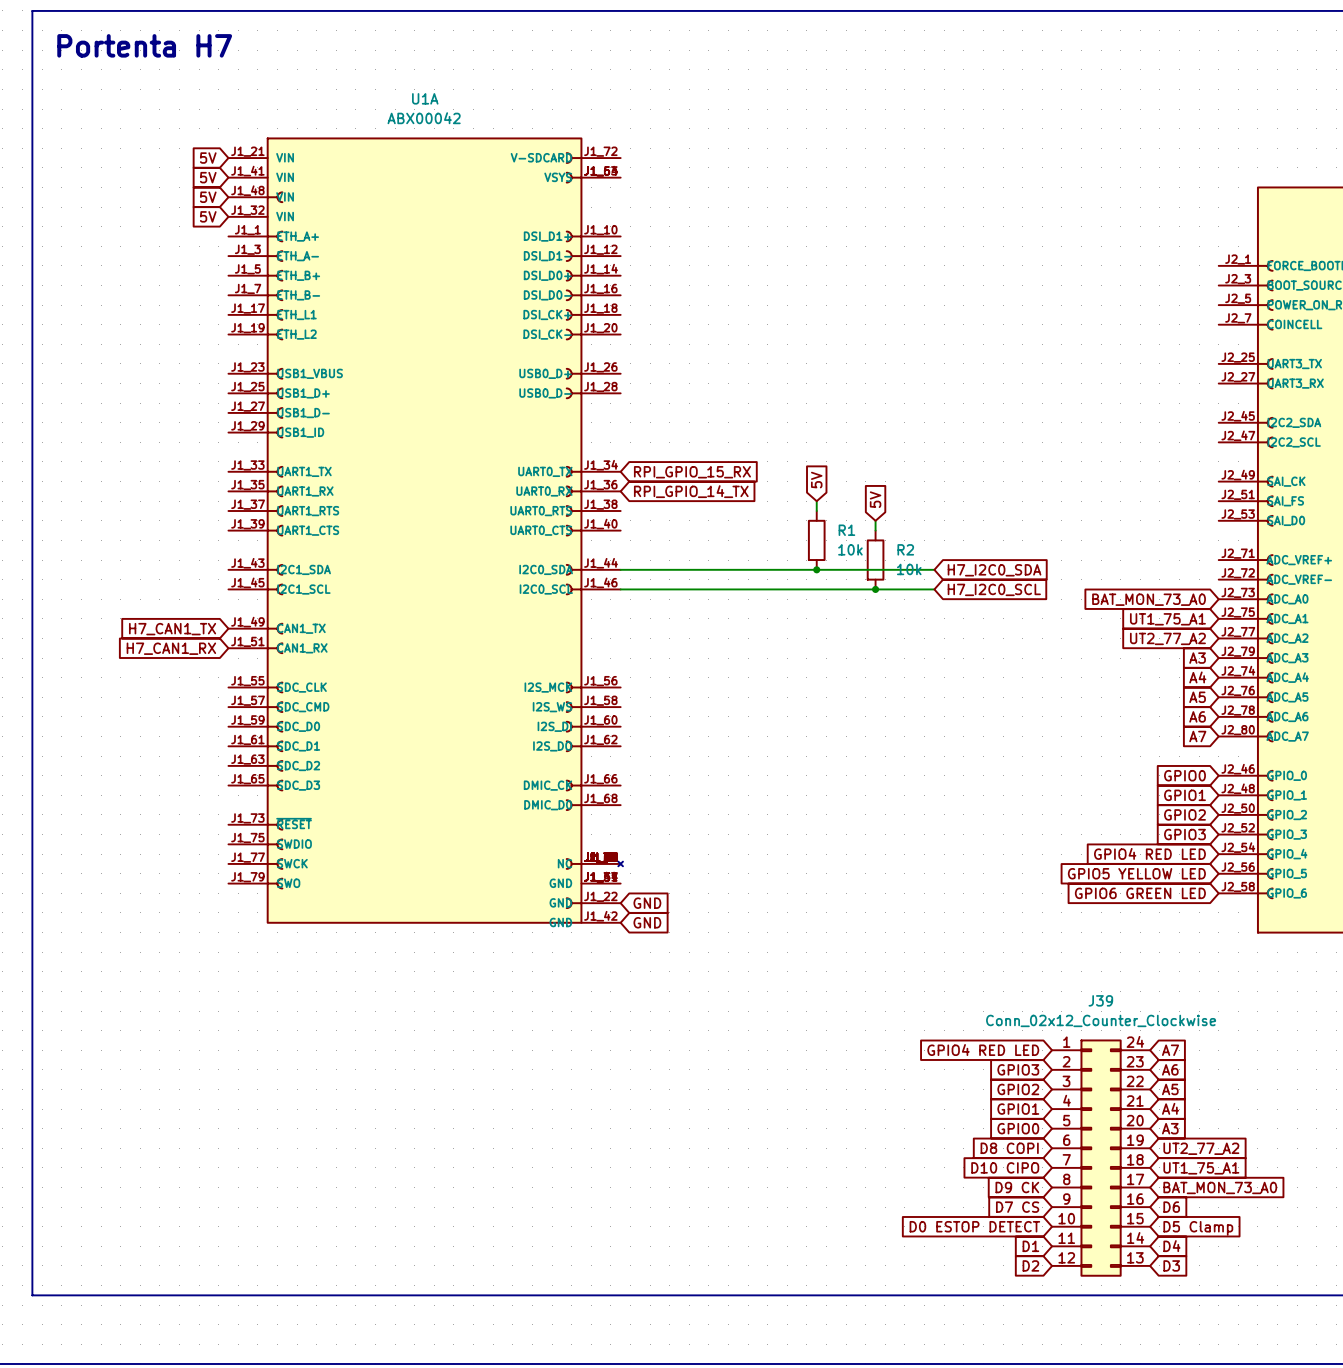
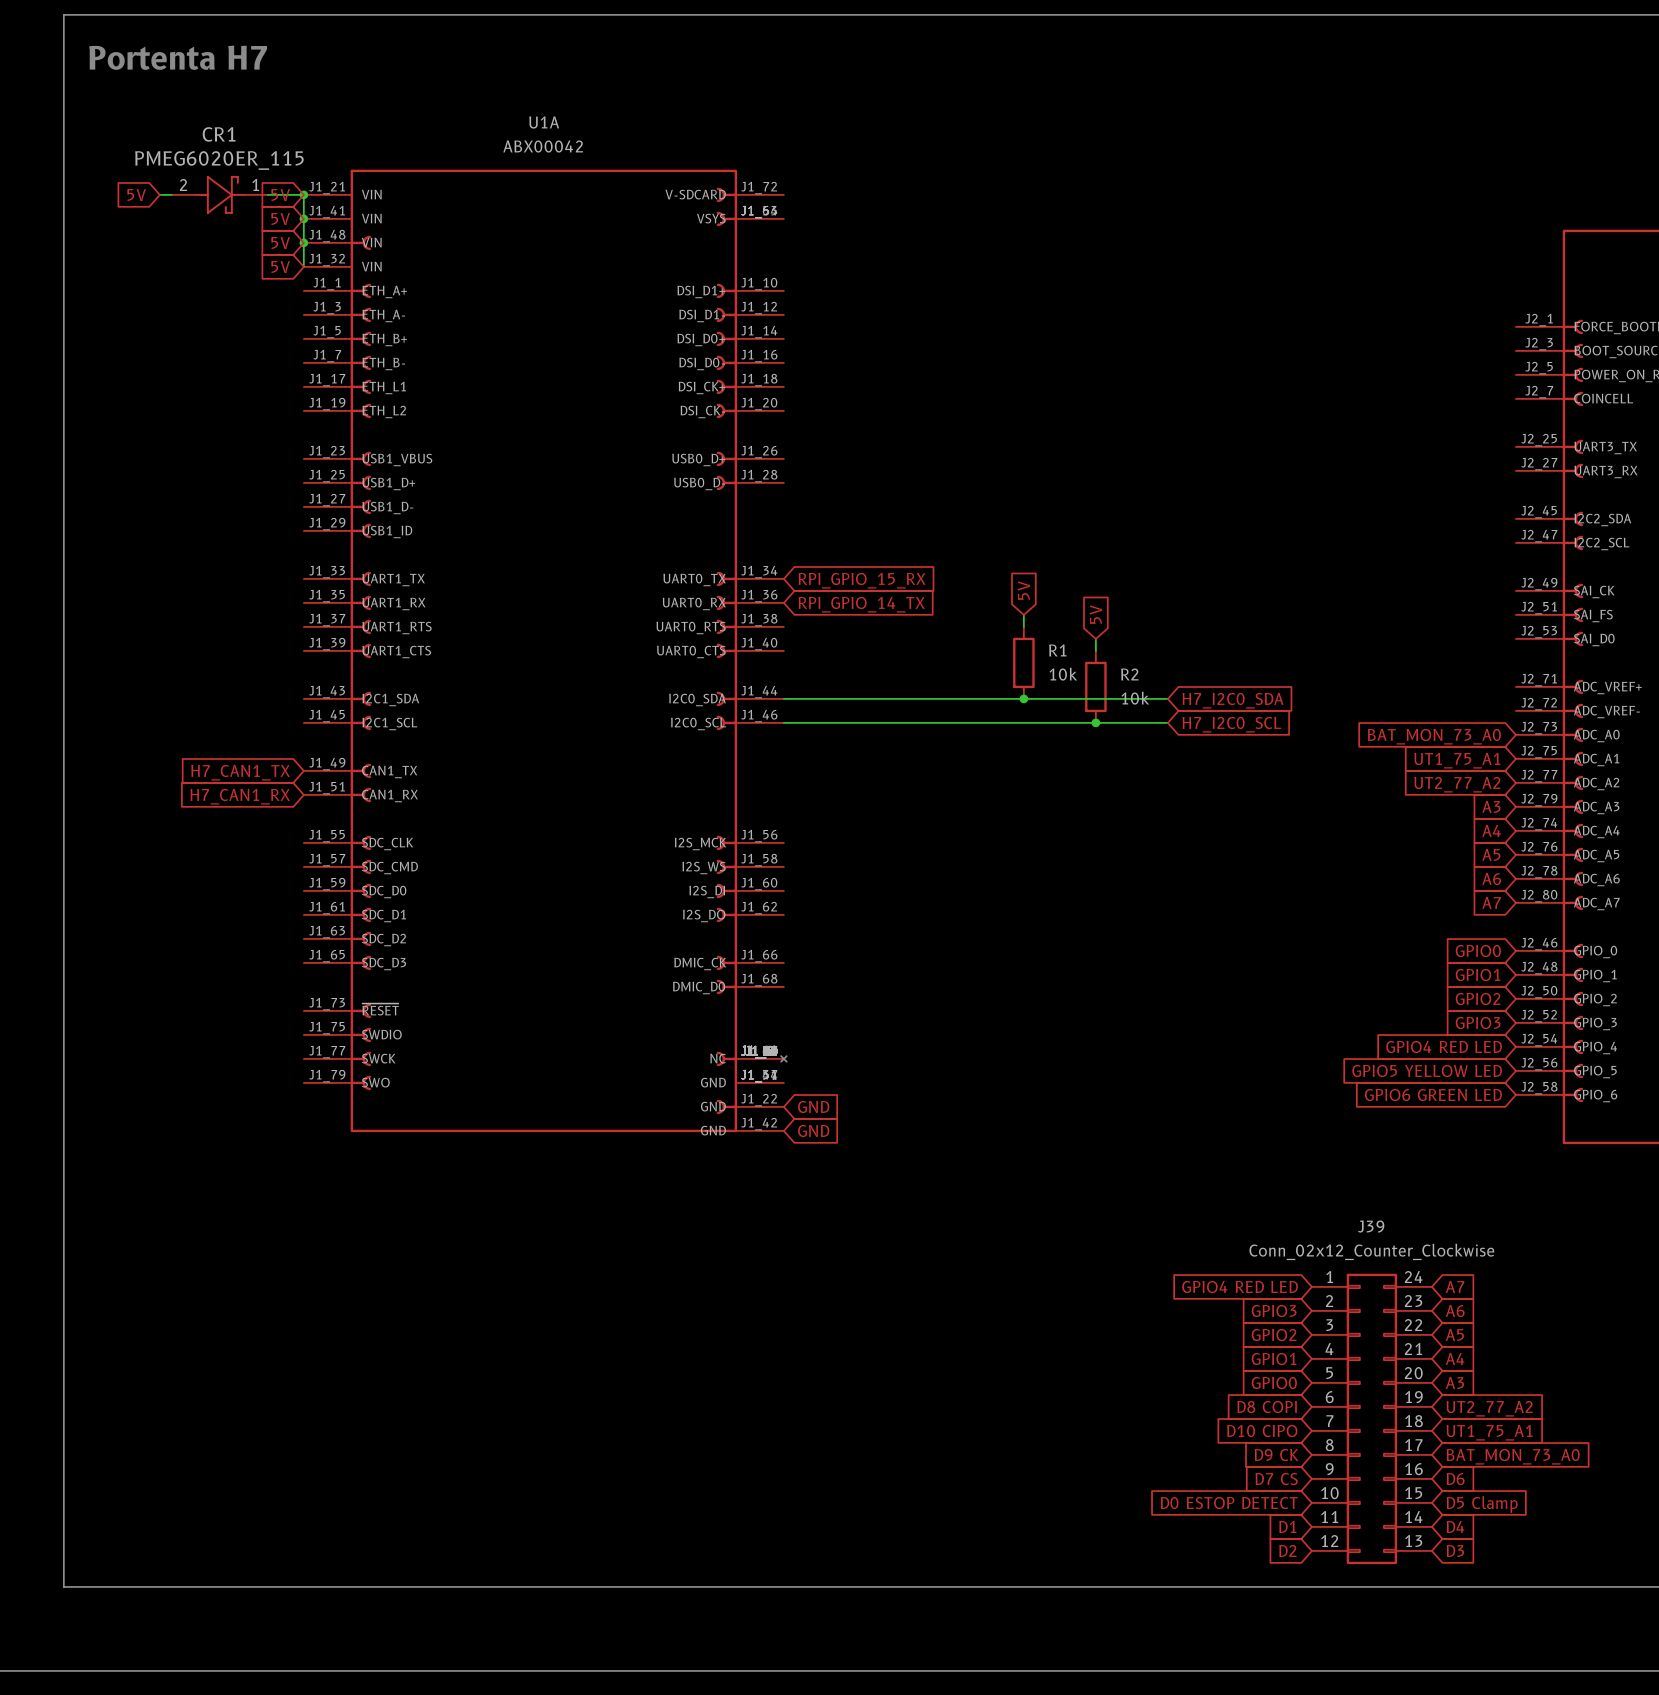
global label: none -> 5V (136, 194)
wire: none -> (159, 194) (171, 194)
CR1: none -> PMEG6020ER_115 (219, 194)
wire: none -> (267, 194) (303, 194) (303, 266)
junction: none -> (303, 194)
junction: none -> (303, 218)
junction: none -> (303, 242)

